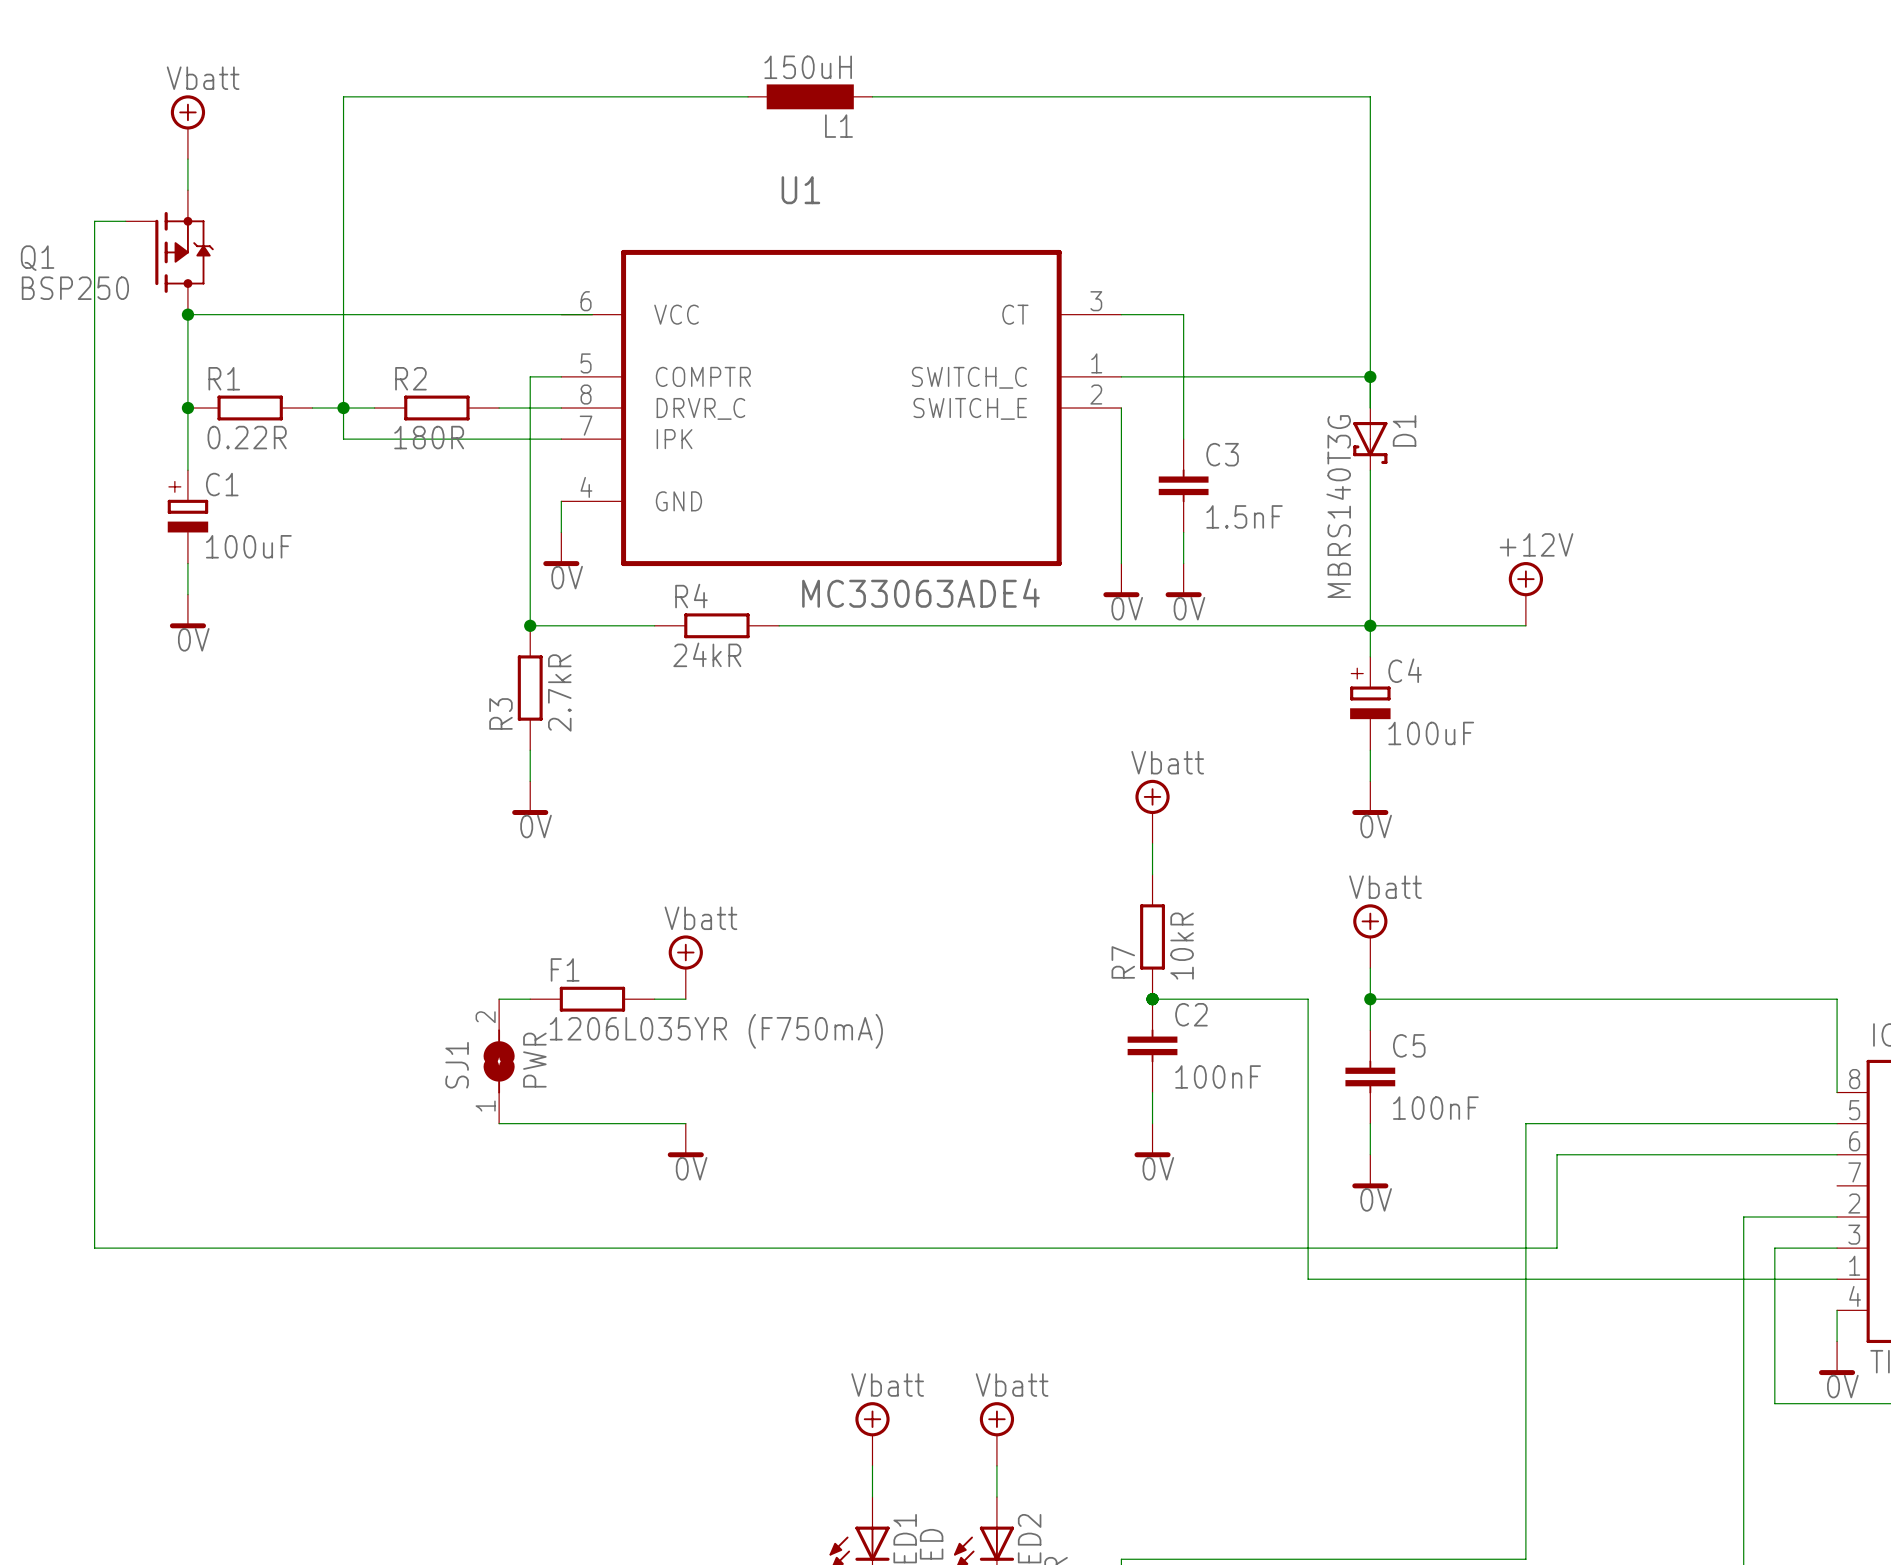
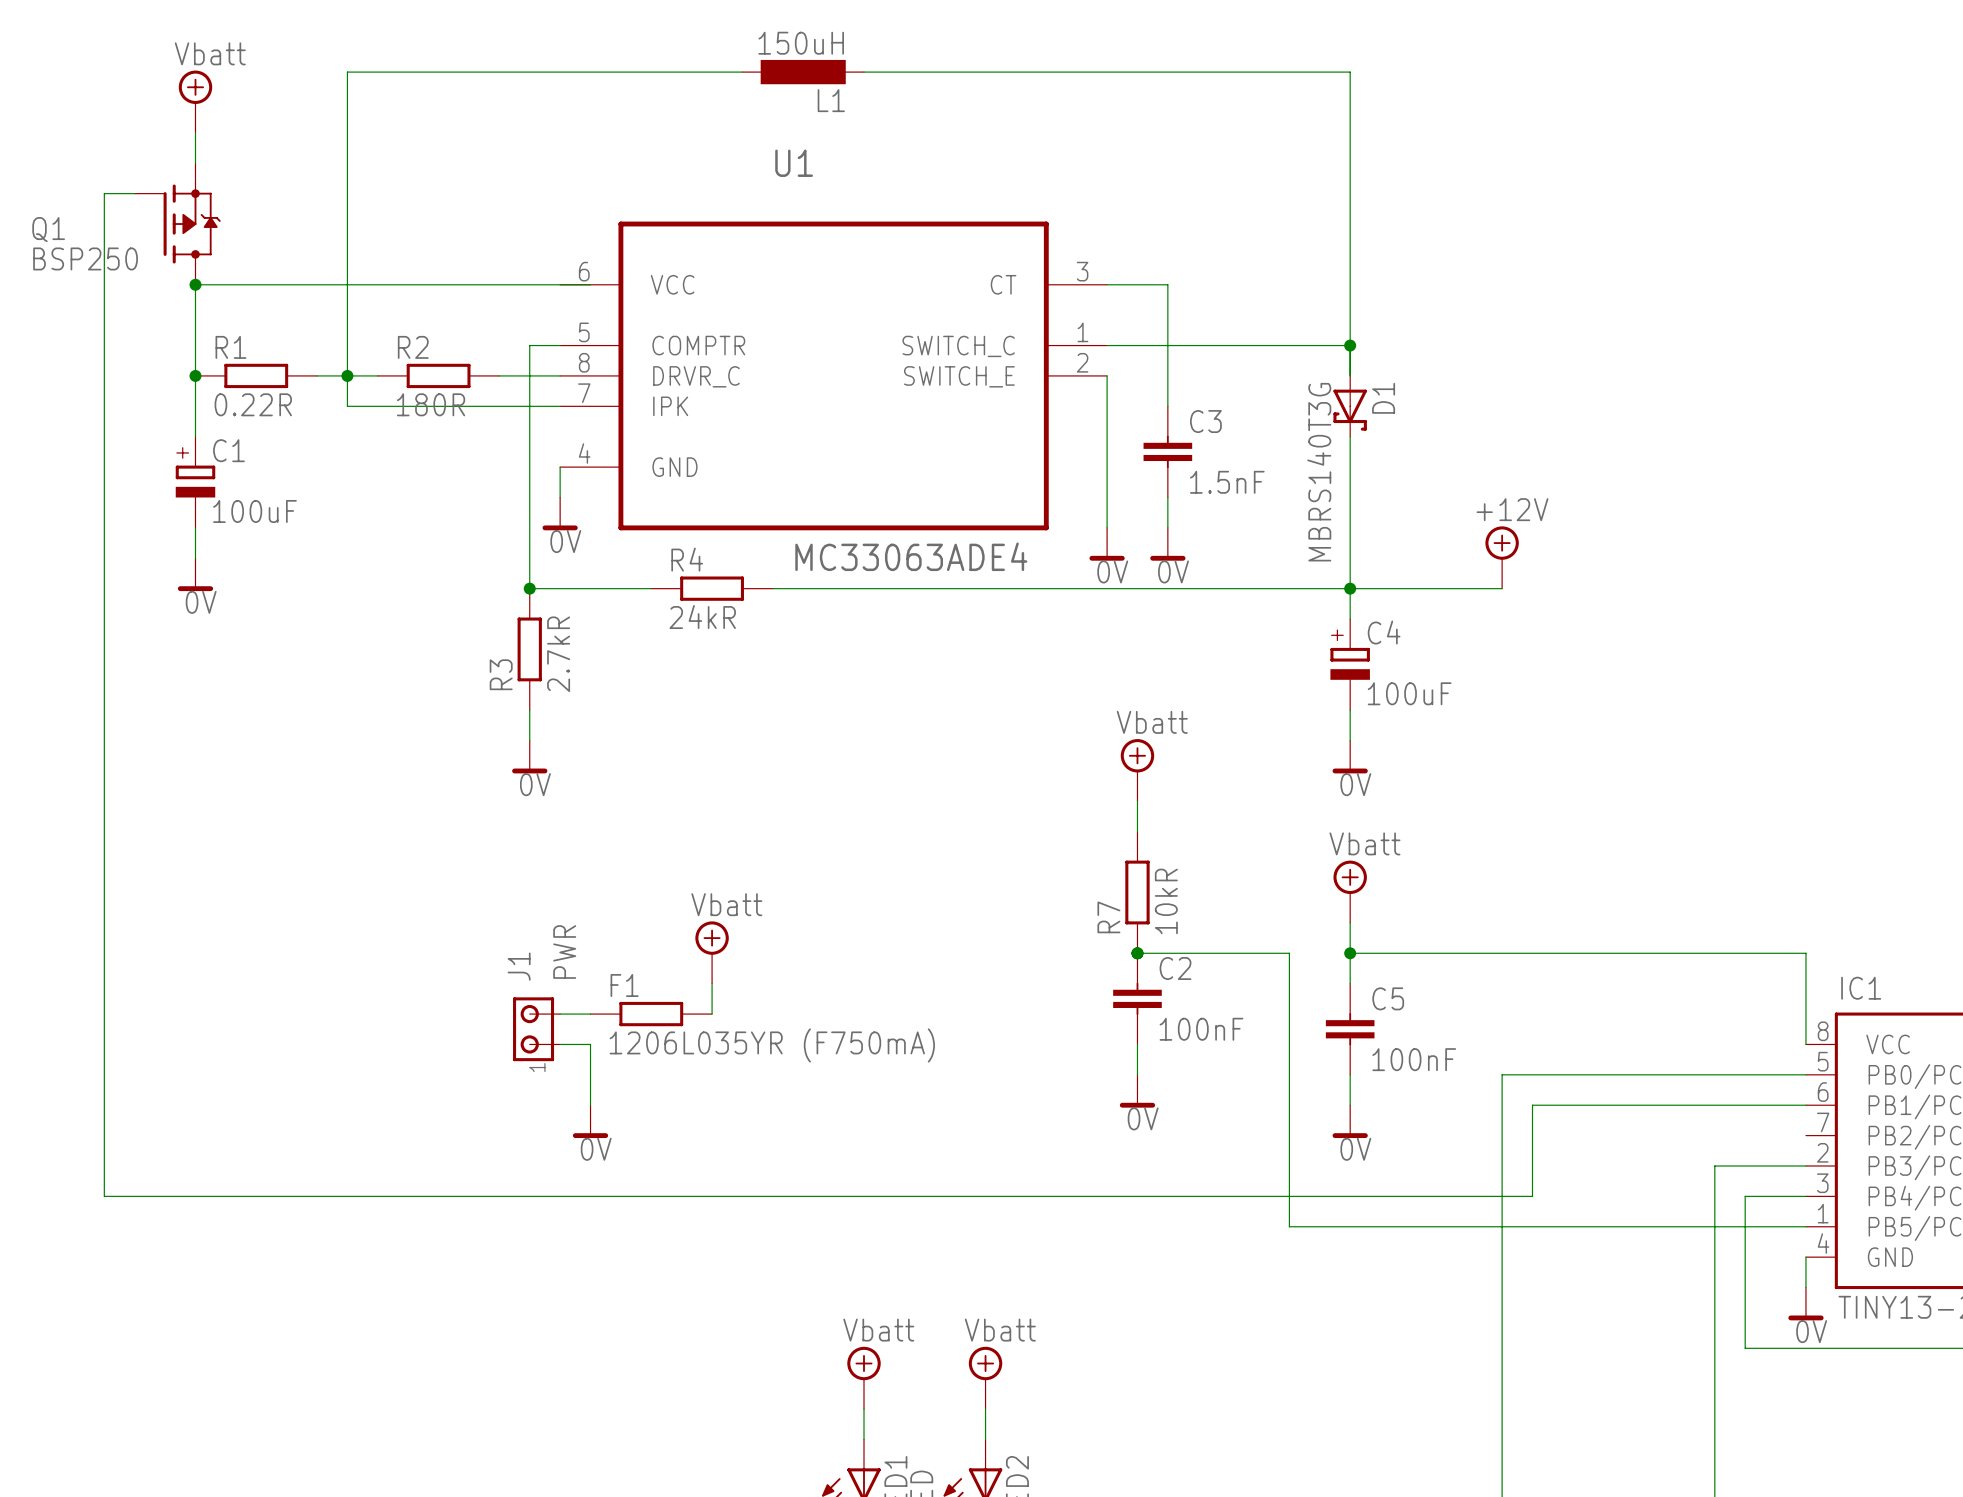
power symbol position: Vbatt (685, 967) -> Vbatt (712, 952)
wire: (499, 999) (530, 999) -> (560, 1014) (590, 1014)
F1 position: (592, 999) -> (651, 1014)
wire: (654, 999) (685, 999) -> none
wire: none -> (712, 983) (712, 1014)
SJ1: PWR (499, 1061) -> none
J1: none -> PWR (536, 1029)
wire: none -> (560, 1044) (590, 1044) (590, 1105)
wire: (499, 1123) (685, 1123) -> none
power symbol position: 0V (685, 1140) -> 0V (590, 1121)

